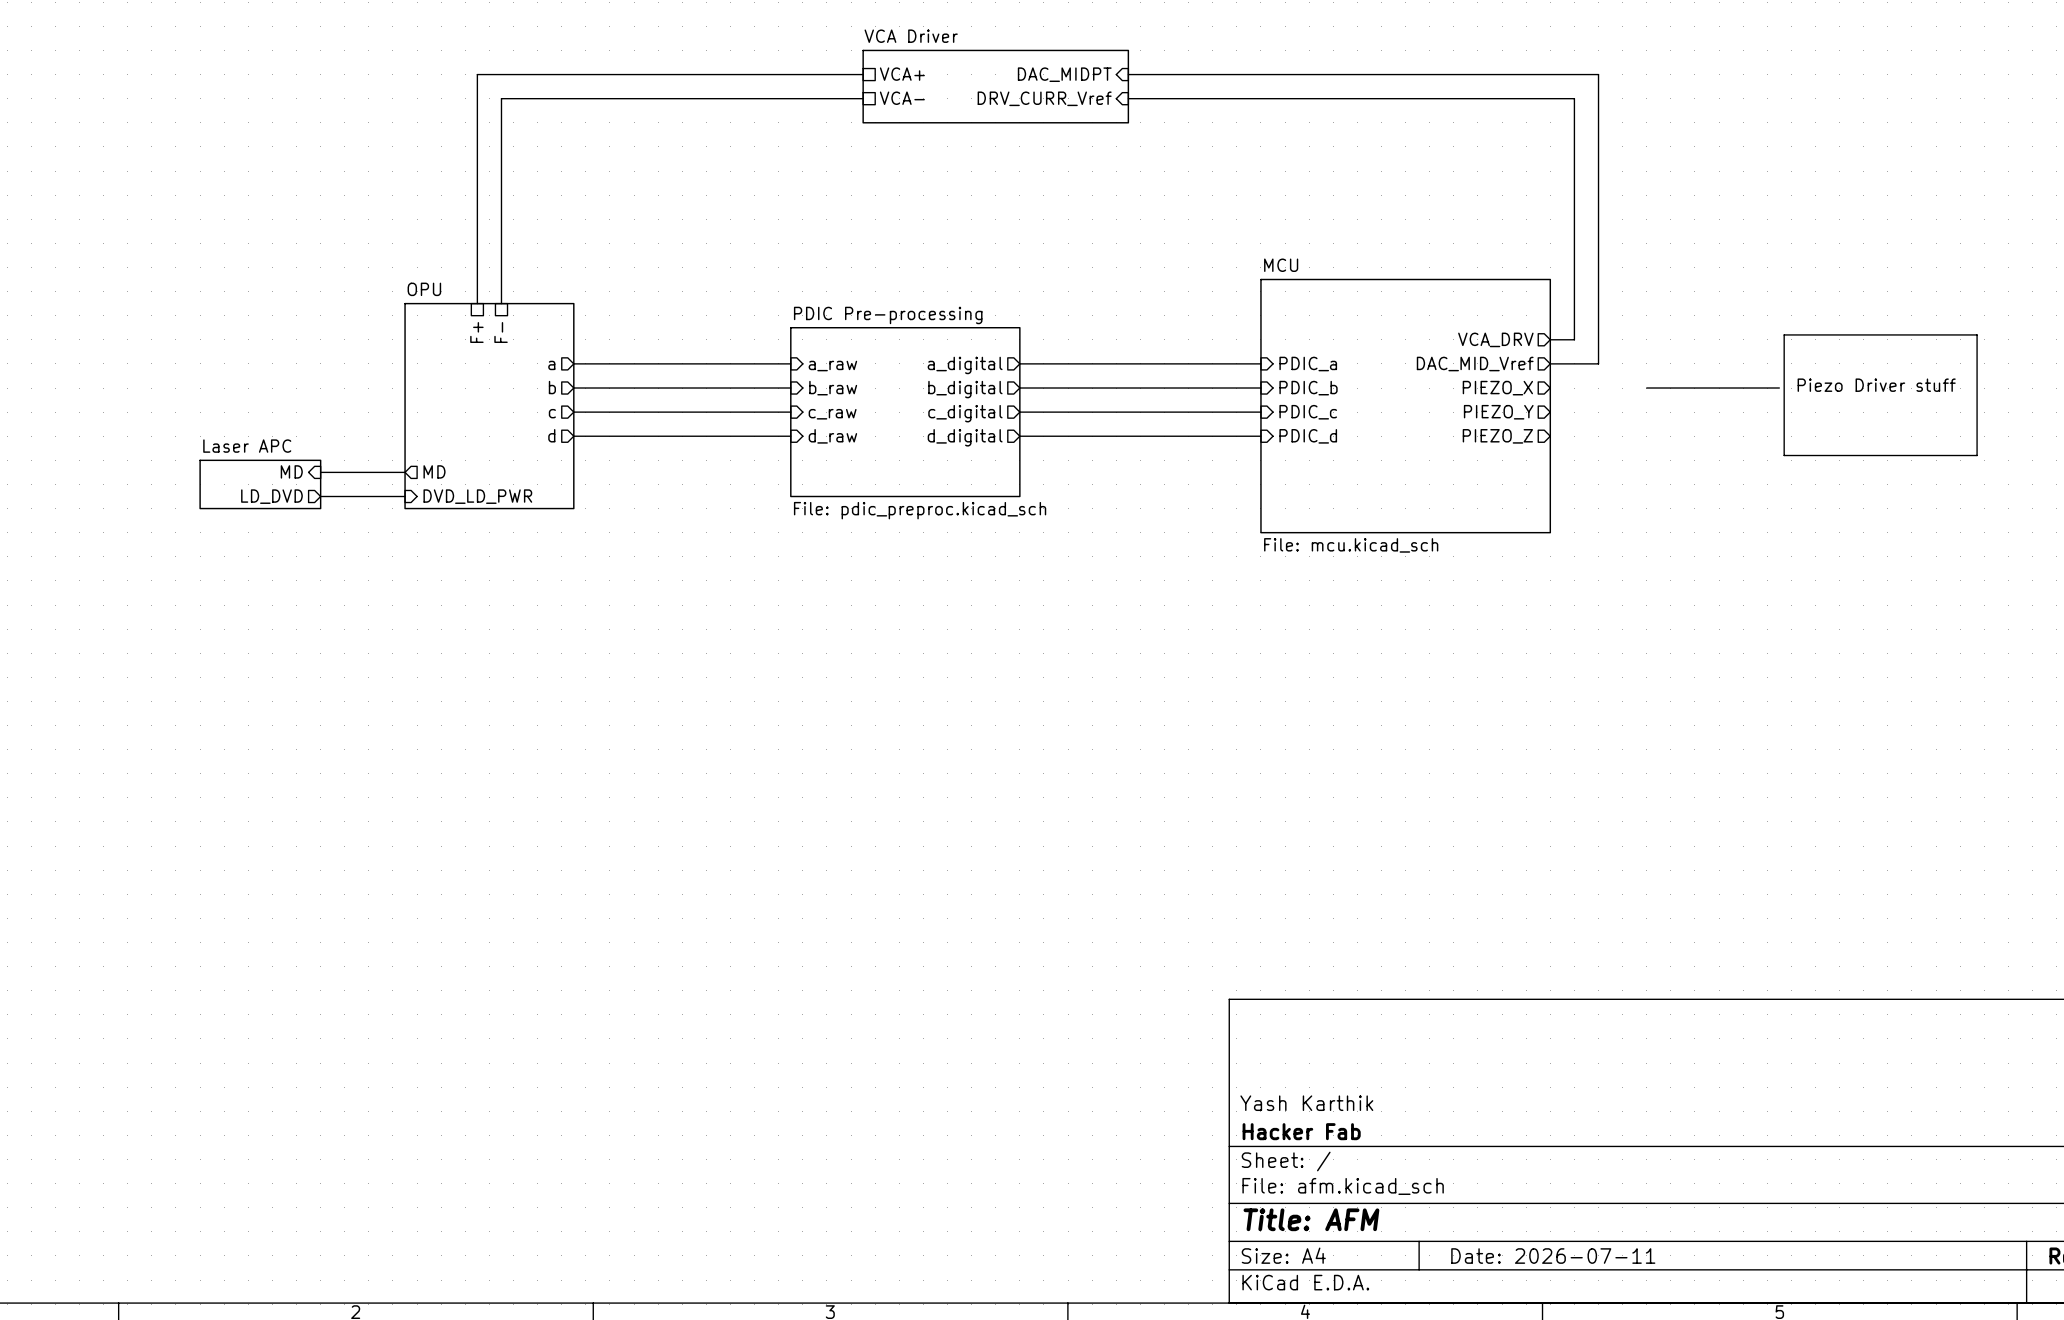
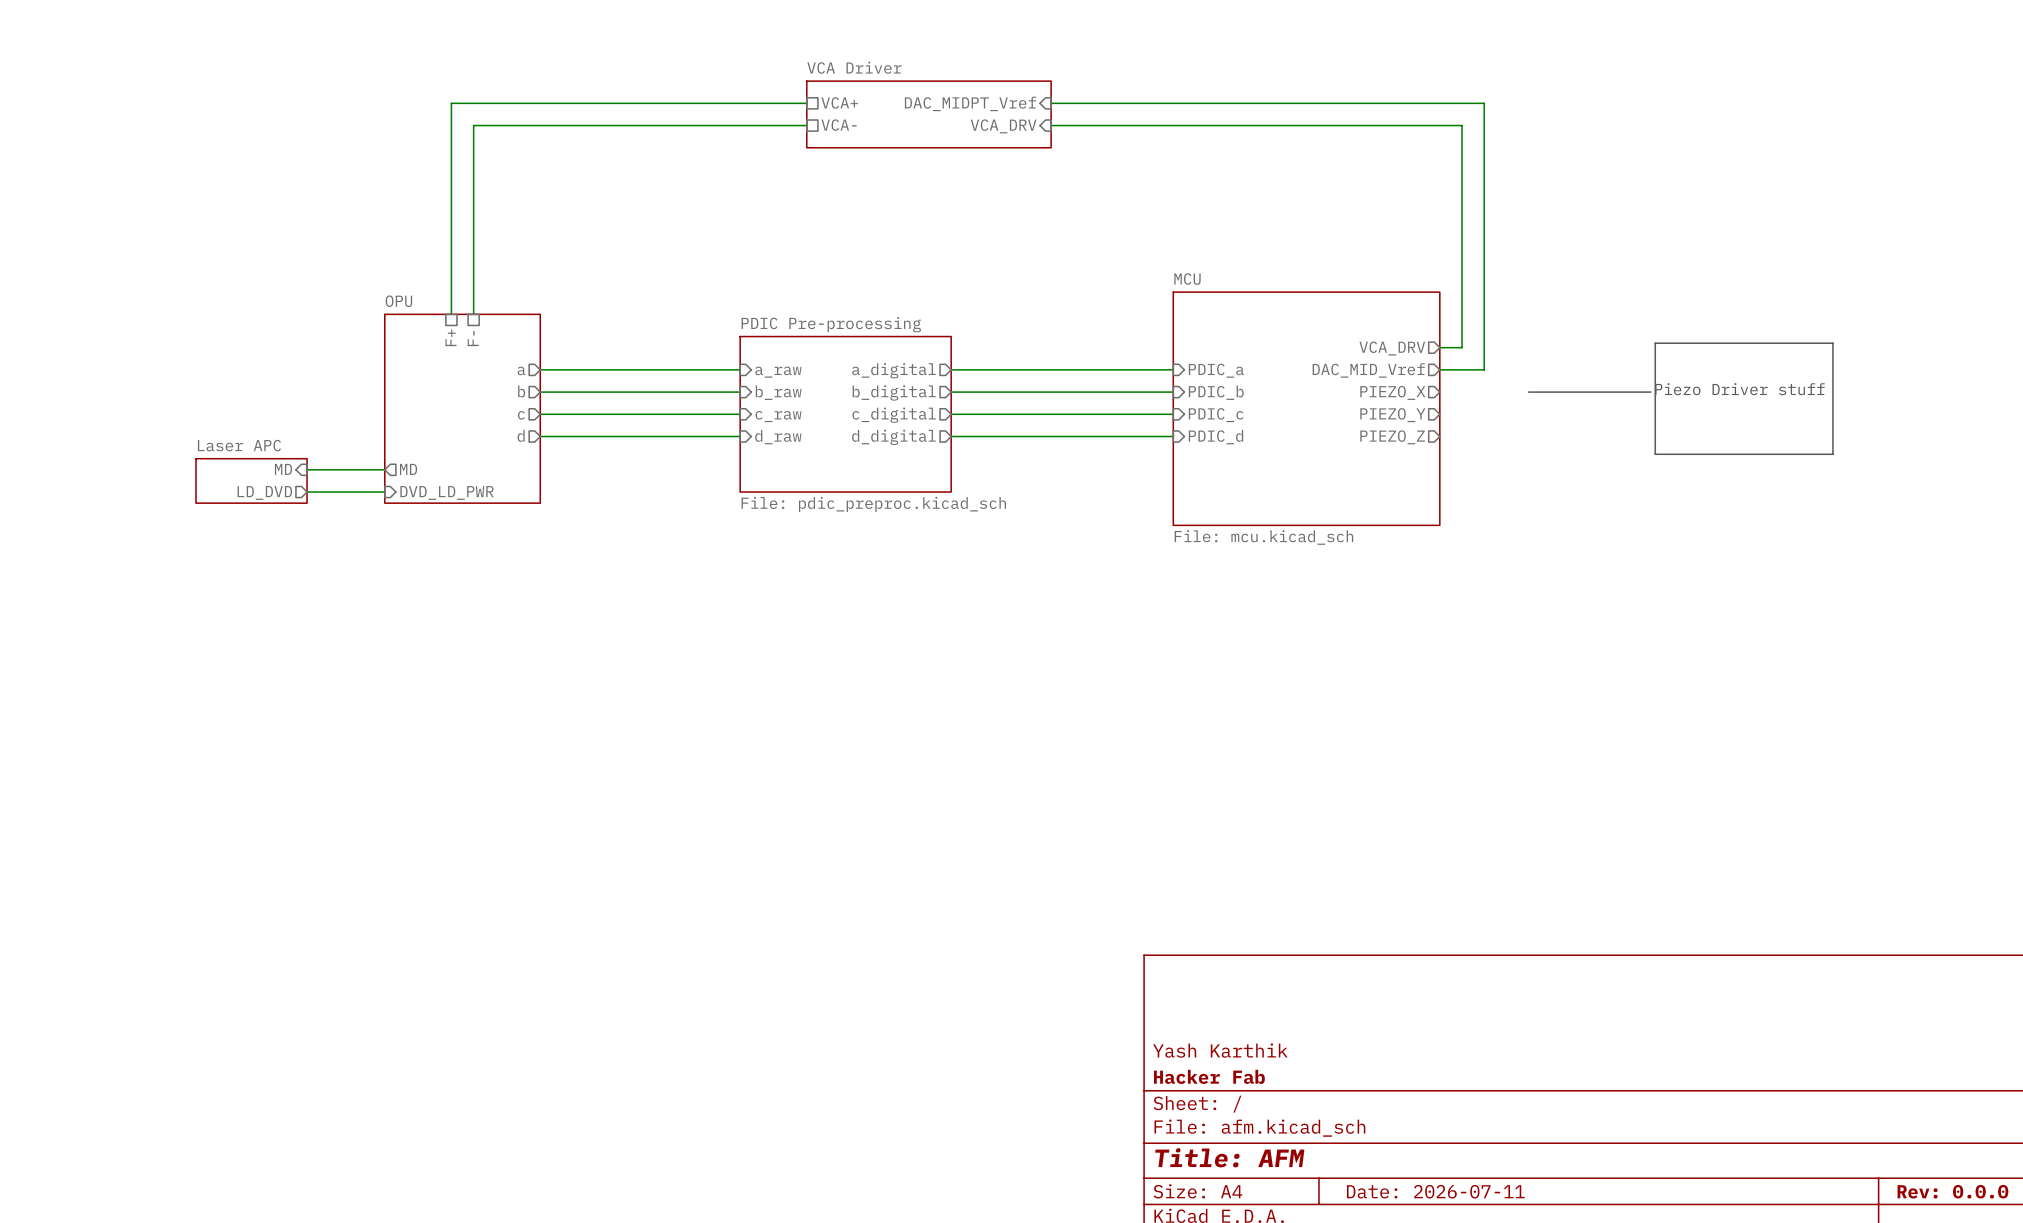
sheet pin: DAC_MIDPT (1064, 74) -> DAC_MIDPT_Vref (970, 103)
sheet pin: DRV_CURR_Vref (1044, 98) -> VCA_DRV (1003, 126)

